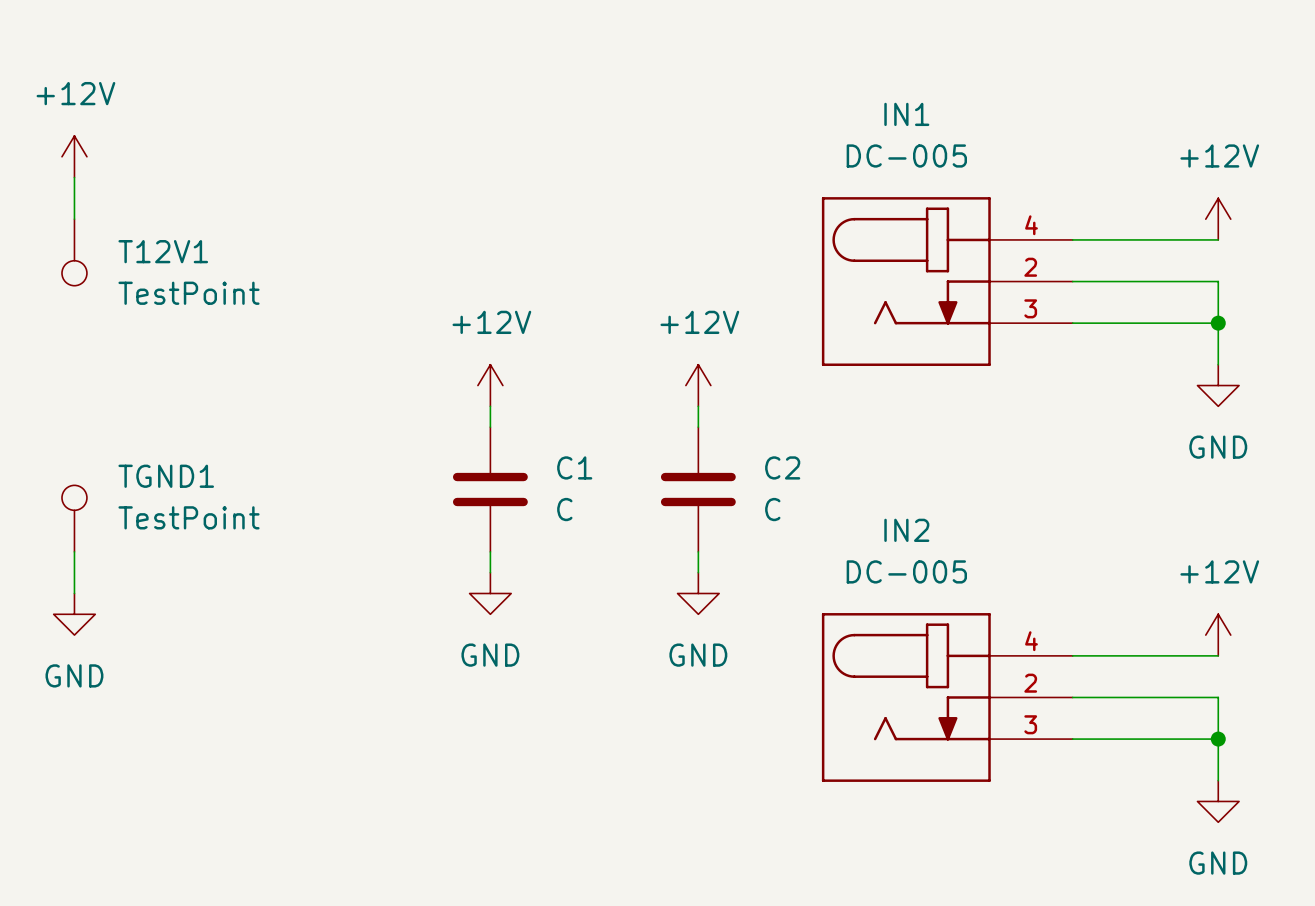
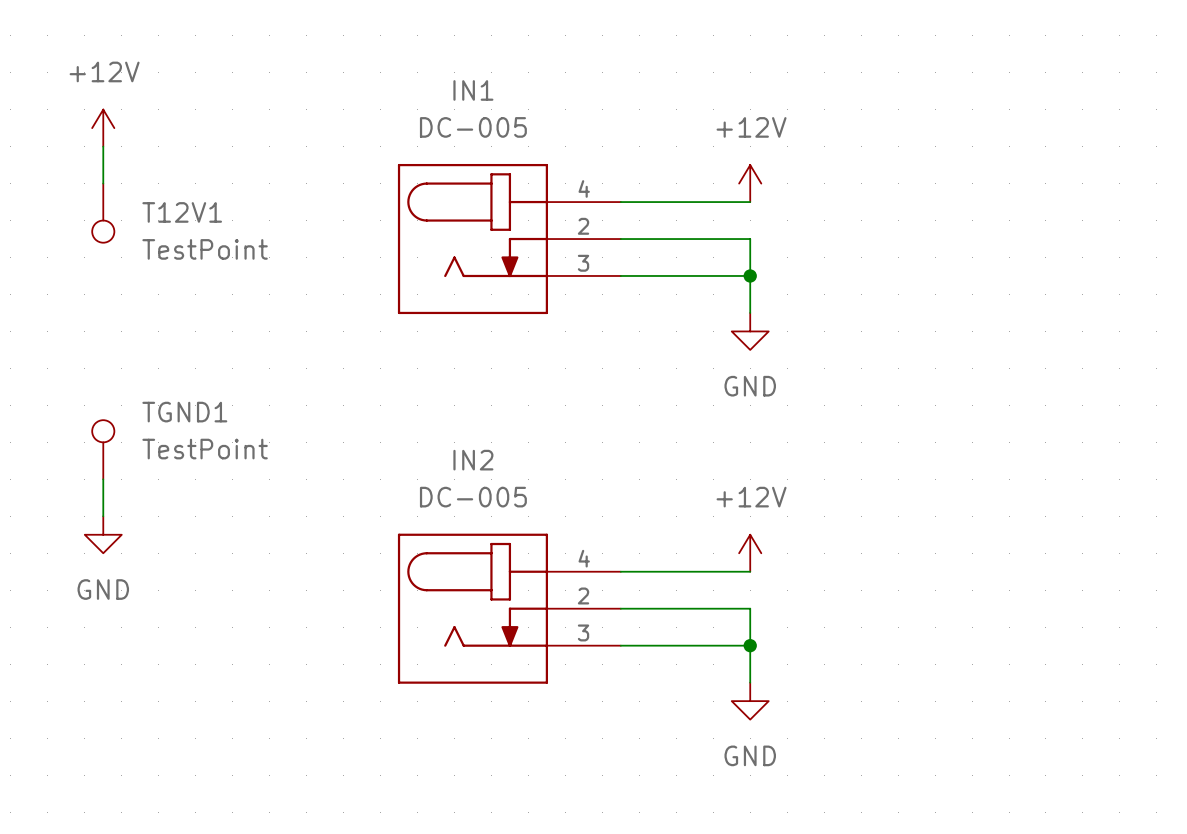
power symbol: none -> +12V (750, 183)
power symbol: +12V (1218, 219) -> none
wire: none -> (620, 202) (750, 202)
wire: (1072, 239) (1218, 239) -> none
wire: none -> (620, 239) (750, 239) (750, 312)
IN1 position: (947, 281) -> (509, 239)
wire: (1072, 281) (1218, 281) (1218, 364) -> none
wire: none -> (620, 275) (750, 275)
junction: none -> (750, 275)
wire: (1072, 323) (1218, 323) -> none
junction: (1218, 323) -> none
power symbol: +12V (490, 385) -> none
power symbol: +12V (698, 385) -> none
power symbol: none -> GND (750, 331)
power symbol: GND (1218, 385) -> none
wire: (490, 406) (490, 427) -> none
wire: (698, 406) (698, 427) -> none
C1: C (490, 489) -> none
C2: C (698, 489) -> none
wire: (490, 551) (490, 572) -> none
wire: (698, 551) (698, 572) -> none
power symbol: GND (490, 593) -> none
power symbol: GND (698, 593) -> none
power symbol: none -> +12V (750, 553)
power symbol: +12V (1218, 635) -> none
wire: none -> (620, 571) (750, 571)
wire: (1072, 655) (1218, 655) -> none
wire: none -> (620, 608) (750, 608) (750, 682)
IN2 position: (947, 697) -> (509, 608)
wire: (1072, 697) (1218, 697) (1218, 780) -> none
wire: none -> (620, 645) (750, 645)
junction: none -> (750, 645)
wire: (1072, 739) (1218, 739) -> none
junction: (1218, 739) -> none
power symbol: none -> GND (750, 701)
power symbol: GND (1218, 801) -> none

